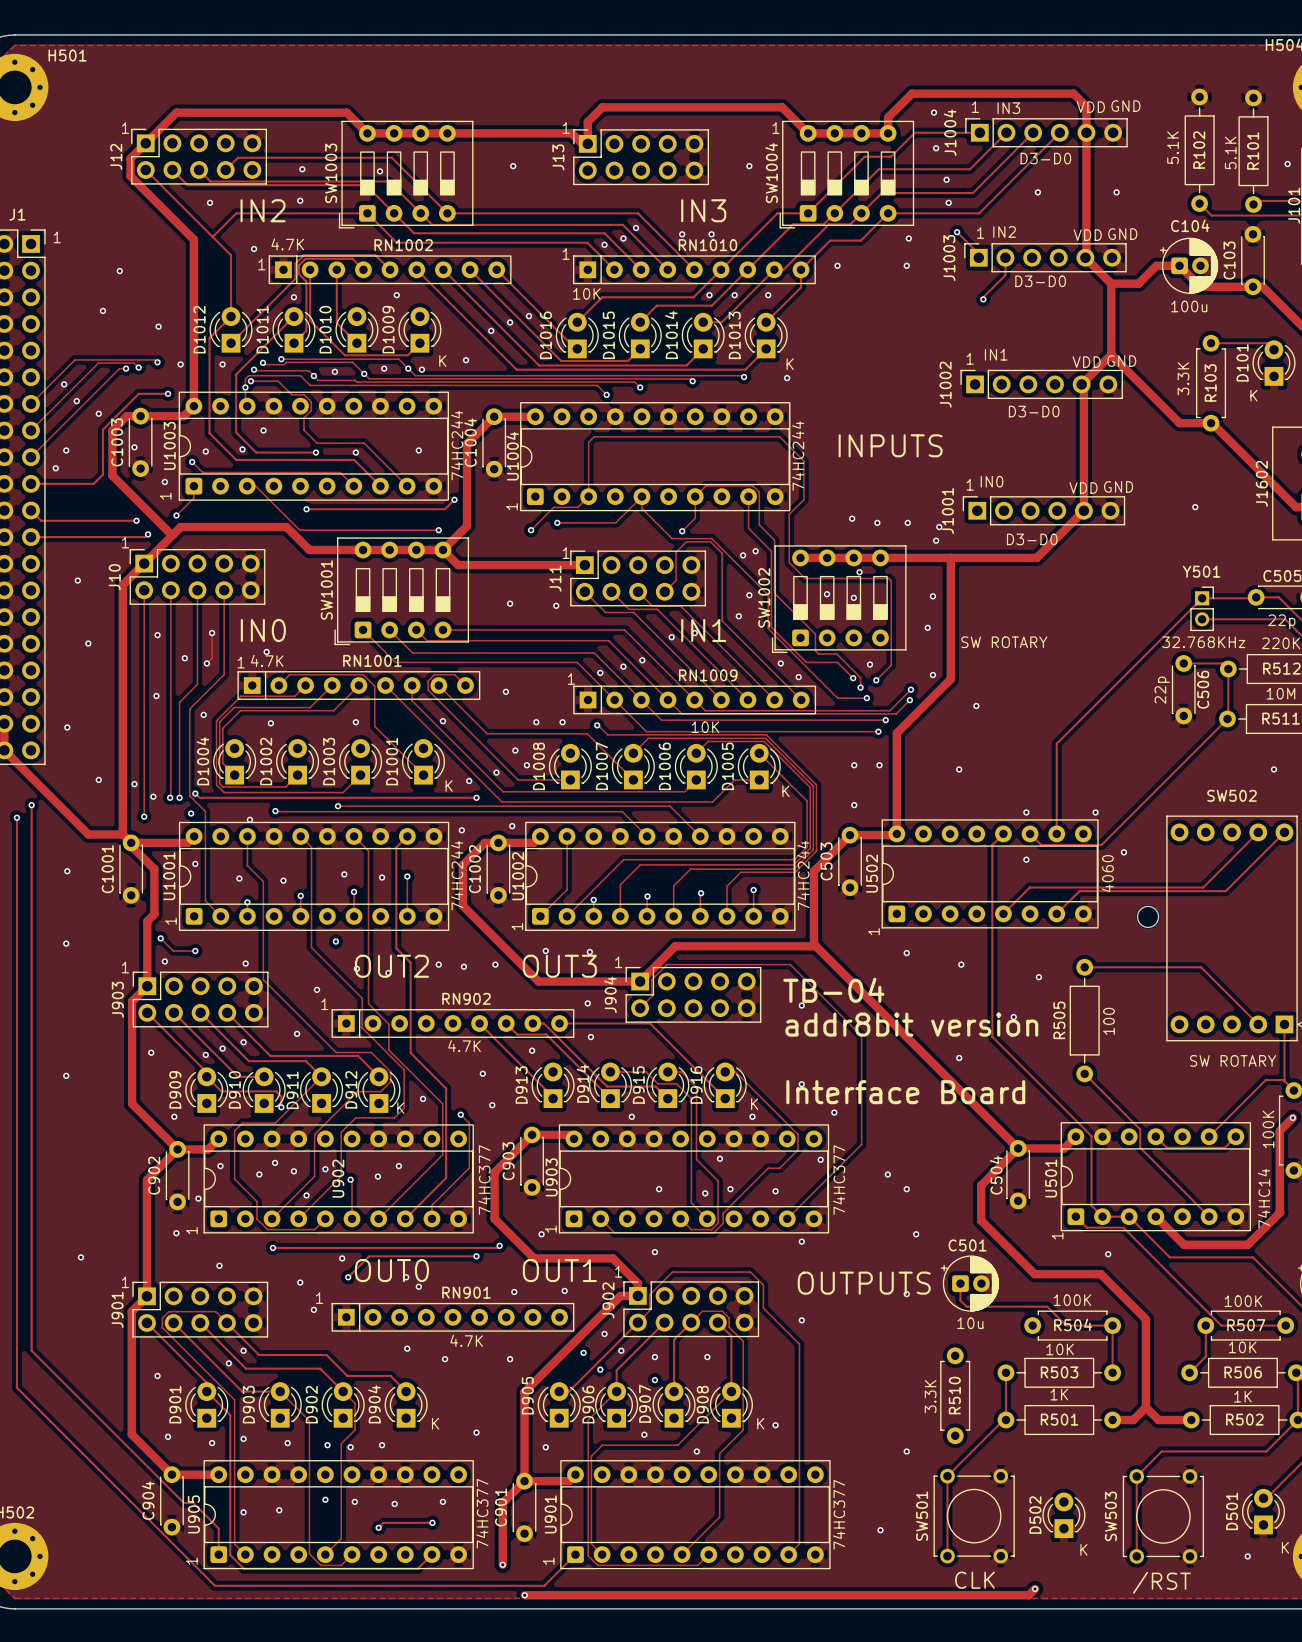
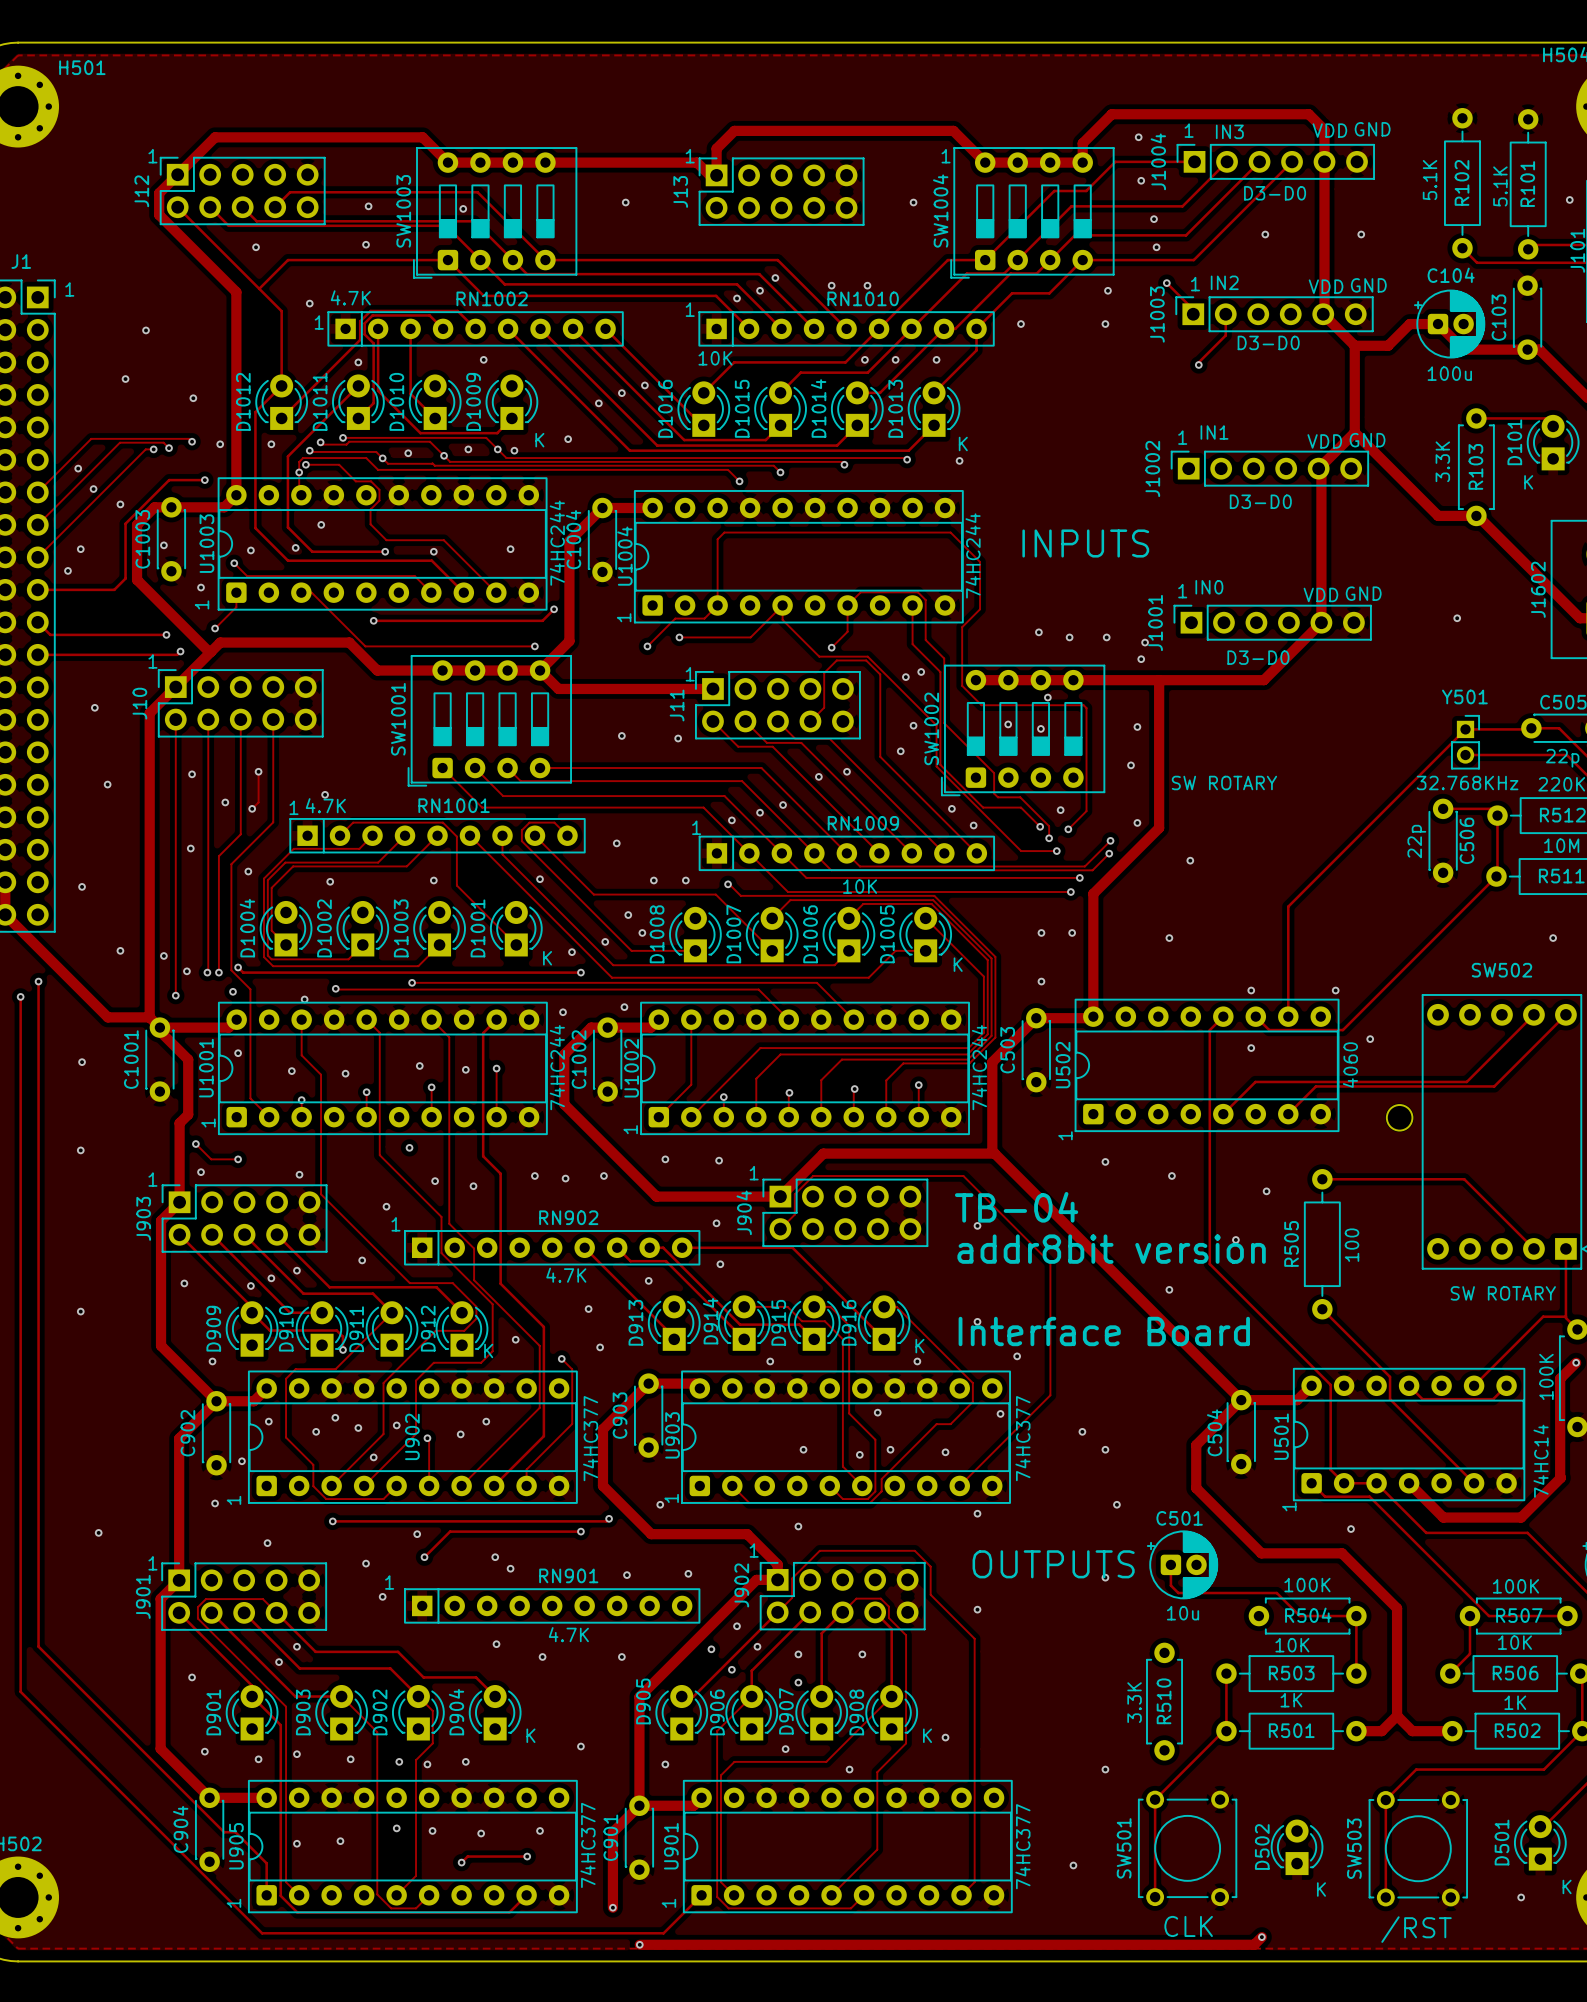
text: IN2 (263, 210) -> none
text: IN3 (703, 210) -> none
text: IN0 (263, 630) -> none
text: IN1 (703, 630) -> none
text: OUT2 (391, 966) -> none
text: OUT3 (559, 966) -> none
text: OUT0 (391, 1270) -> none
text: OUT1 (559, 1270) -> none

